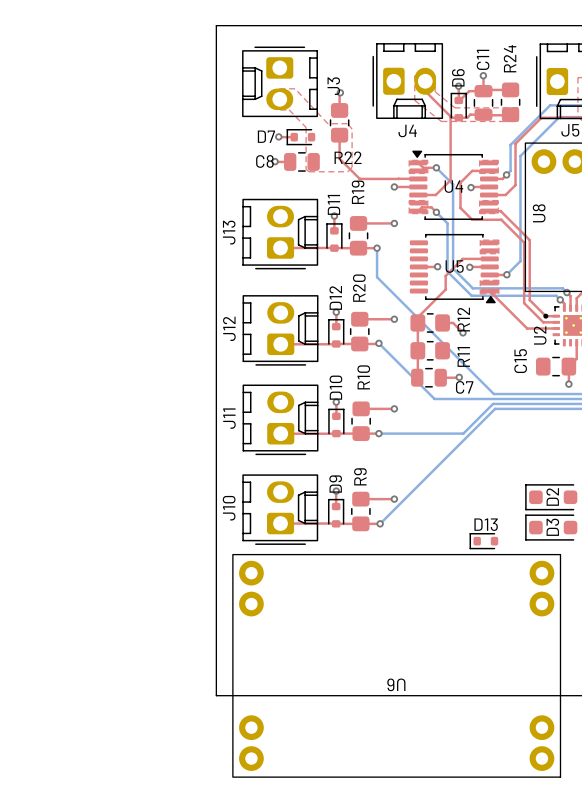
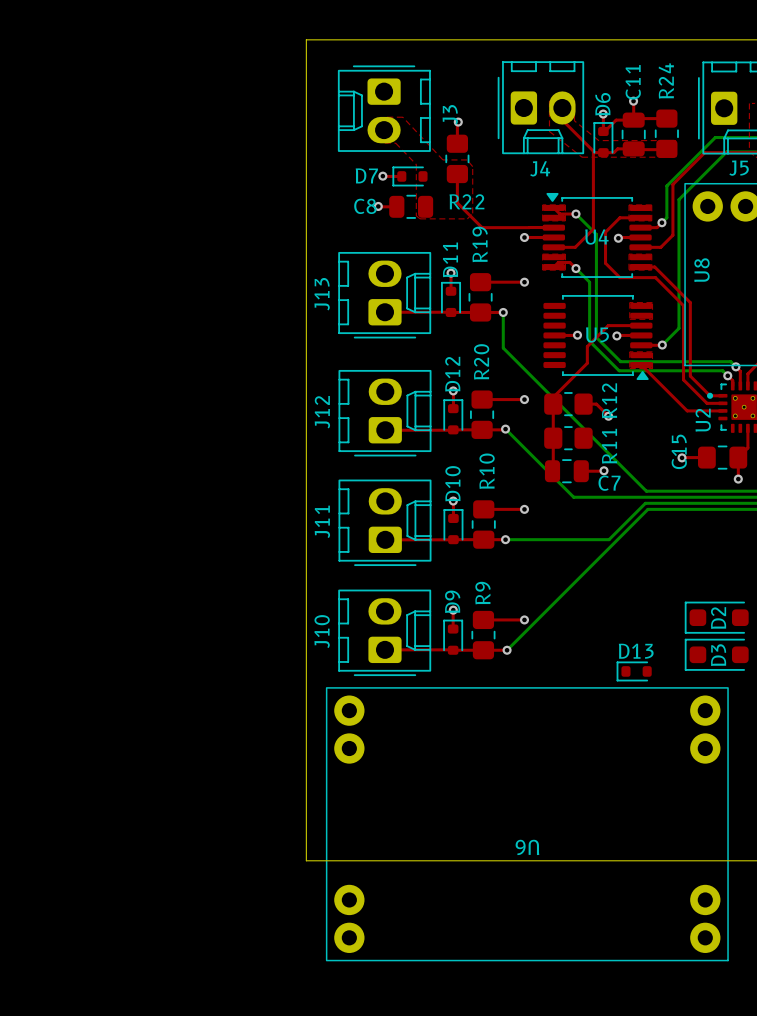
via: none -> (682, 457)
top track: none -> (706, 457) (682, 457)

